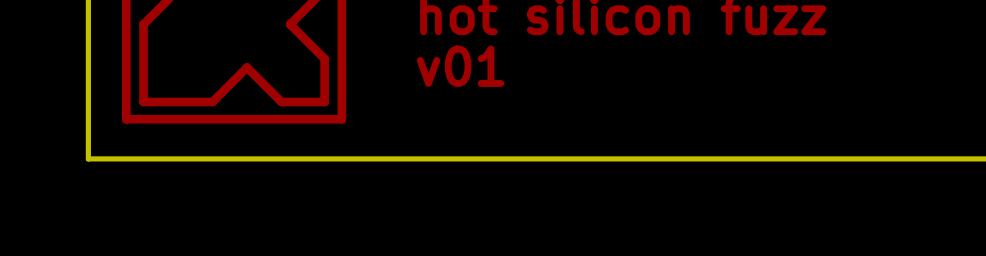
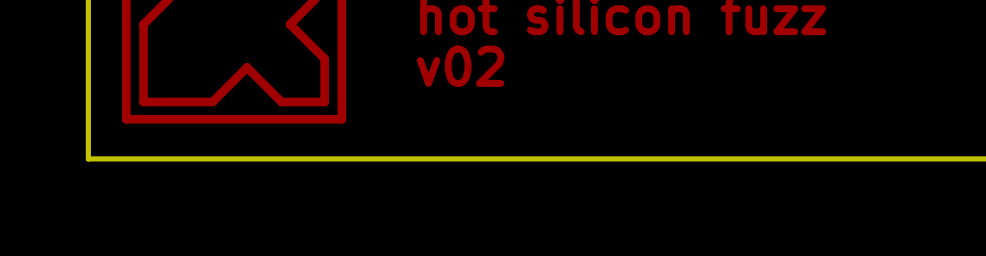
text: v01 (460, 66) -> v02 (460, 66)

